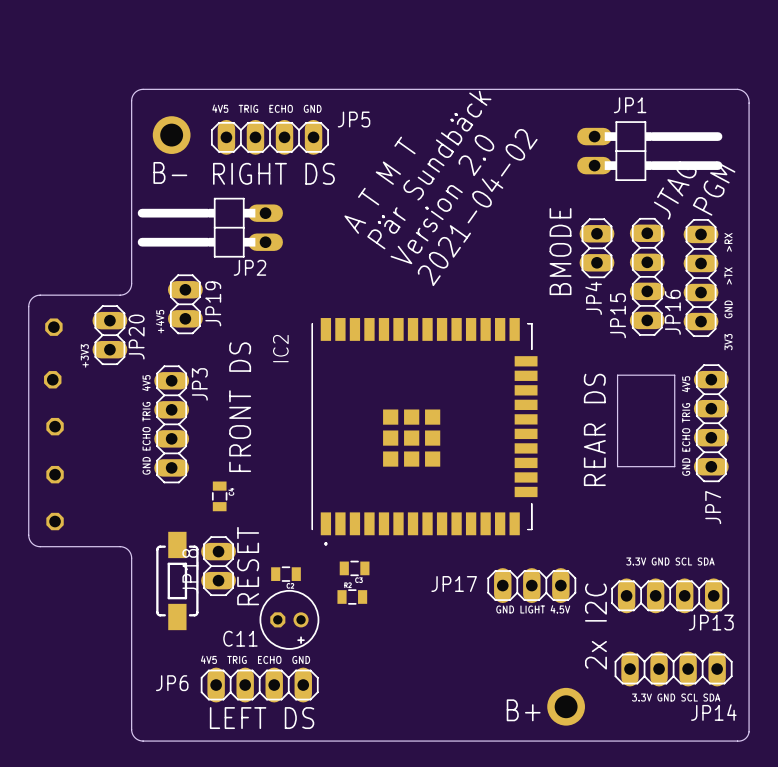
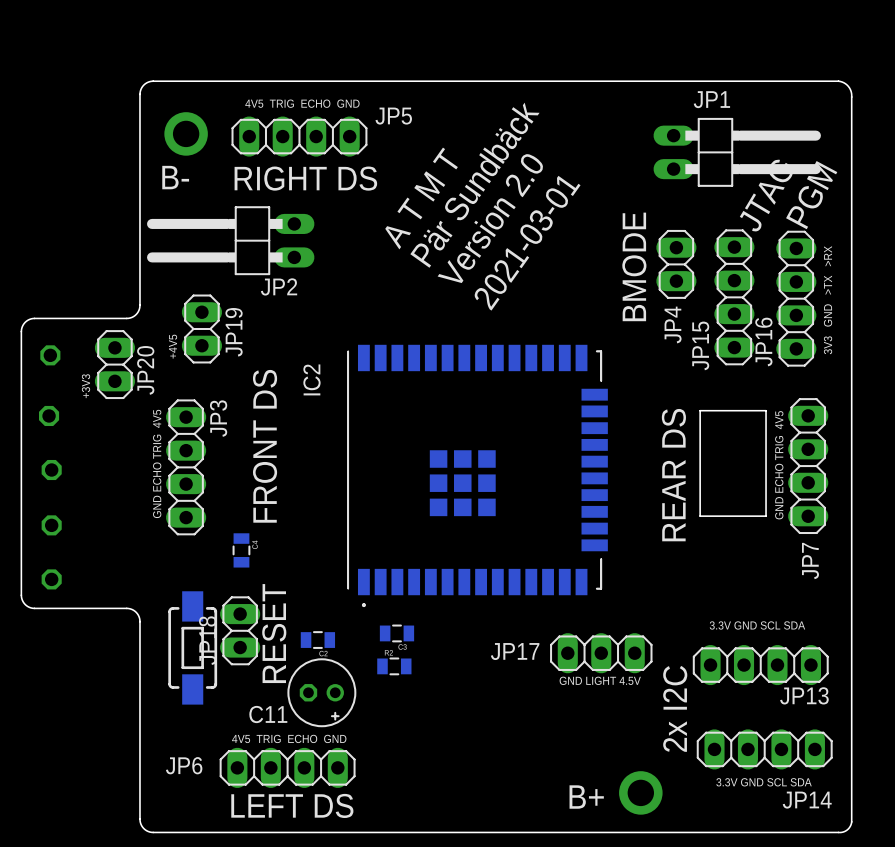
text: 2021-04-02 (477, 207) -> 2021-03-01 (527, 243)

